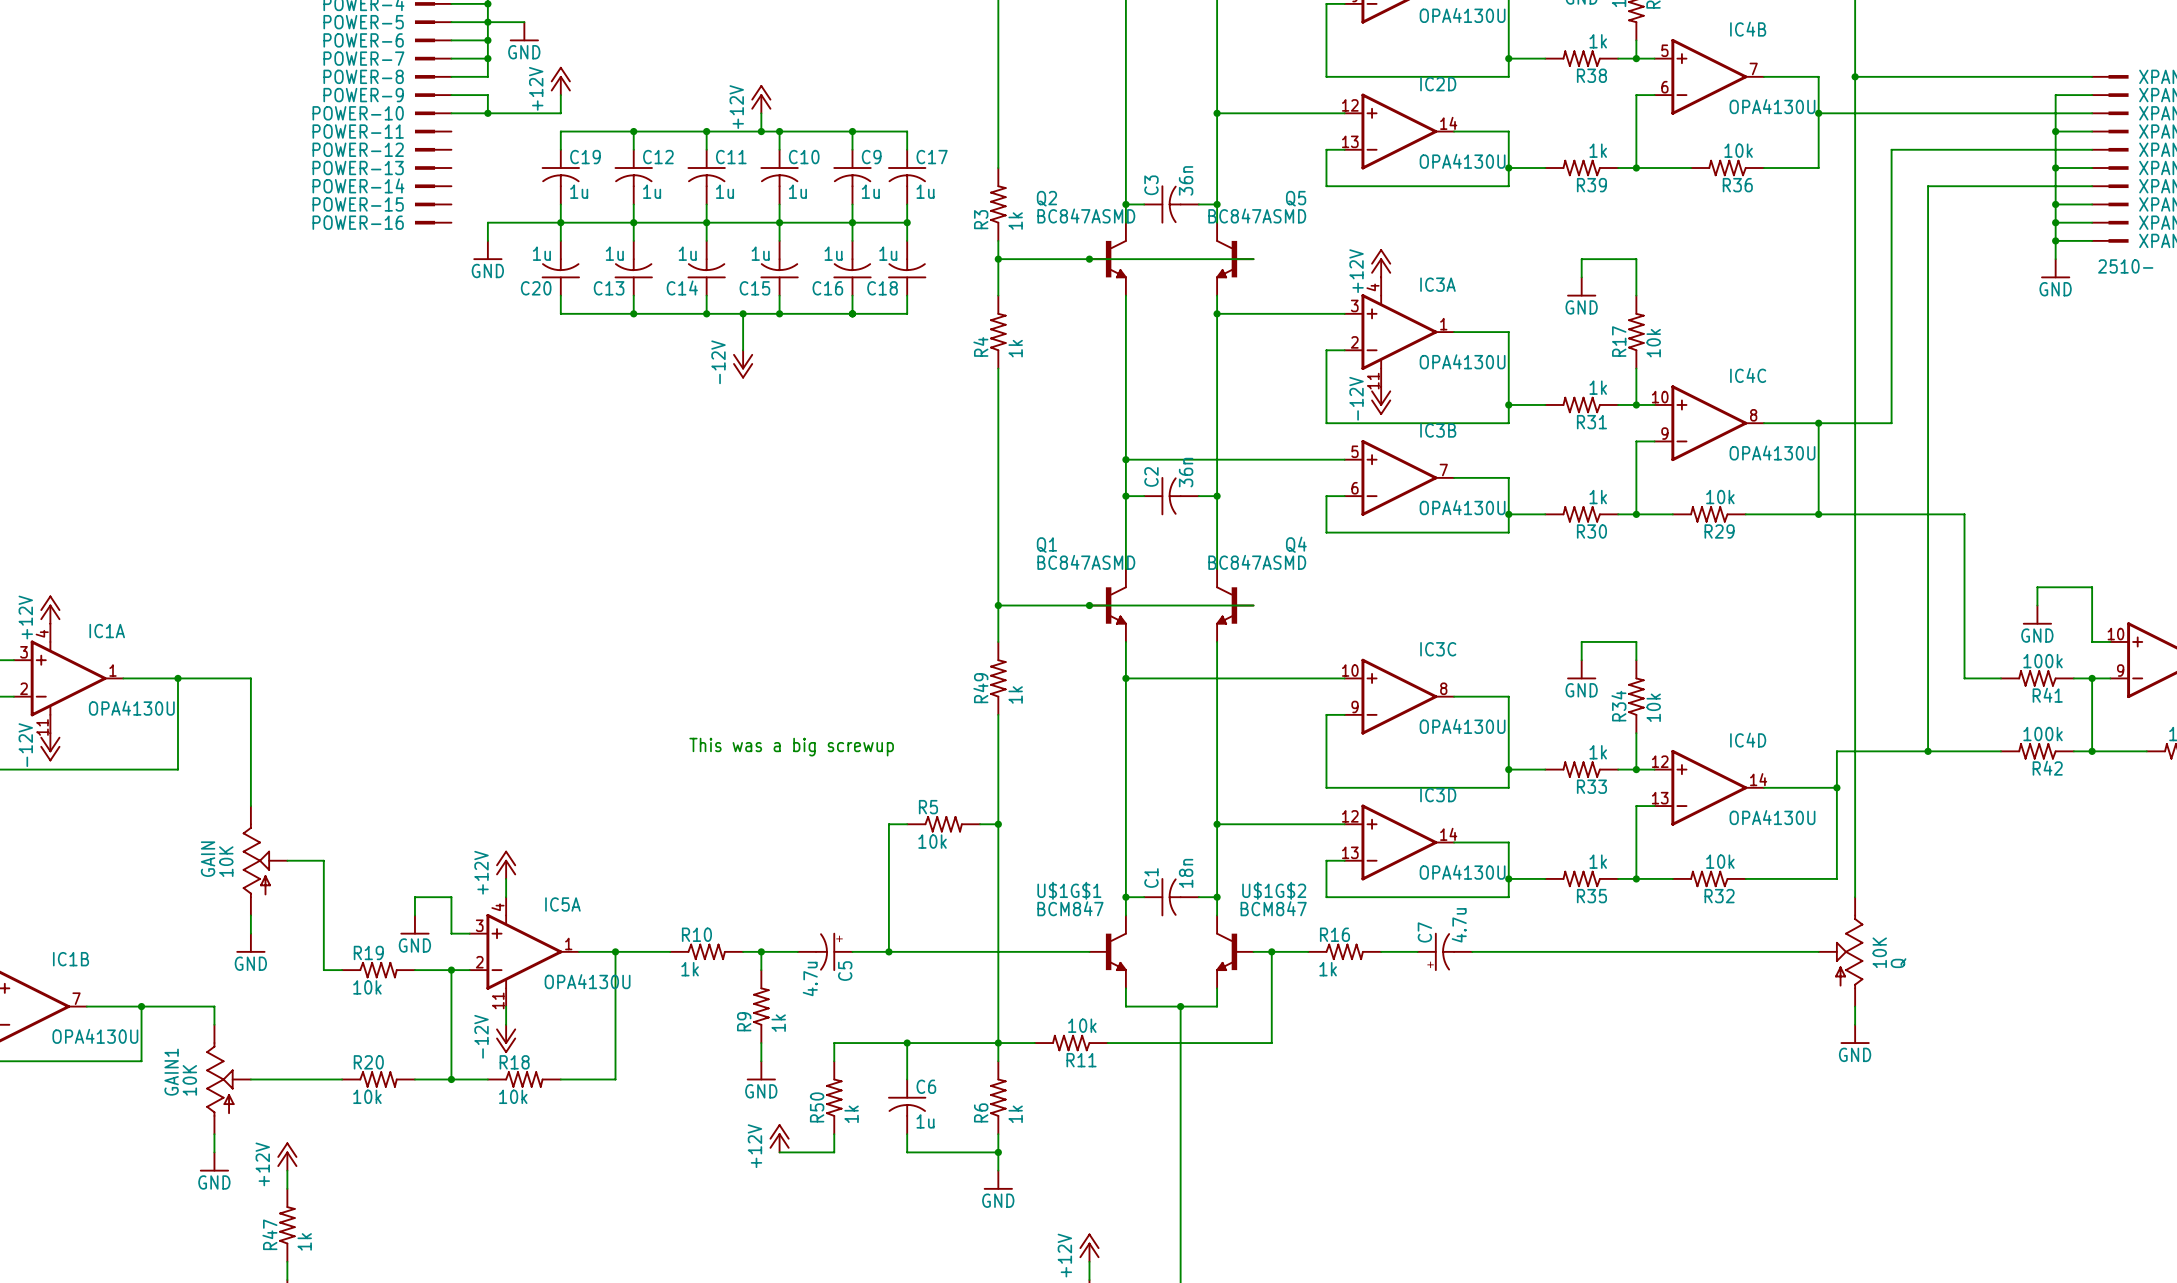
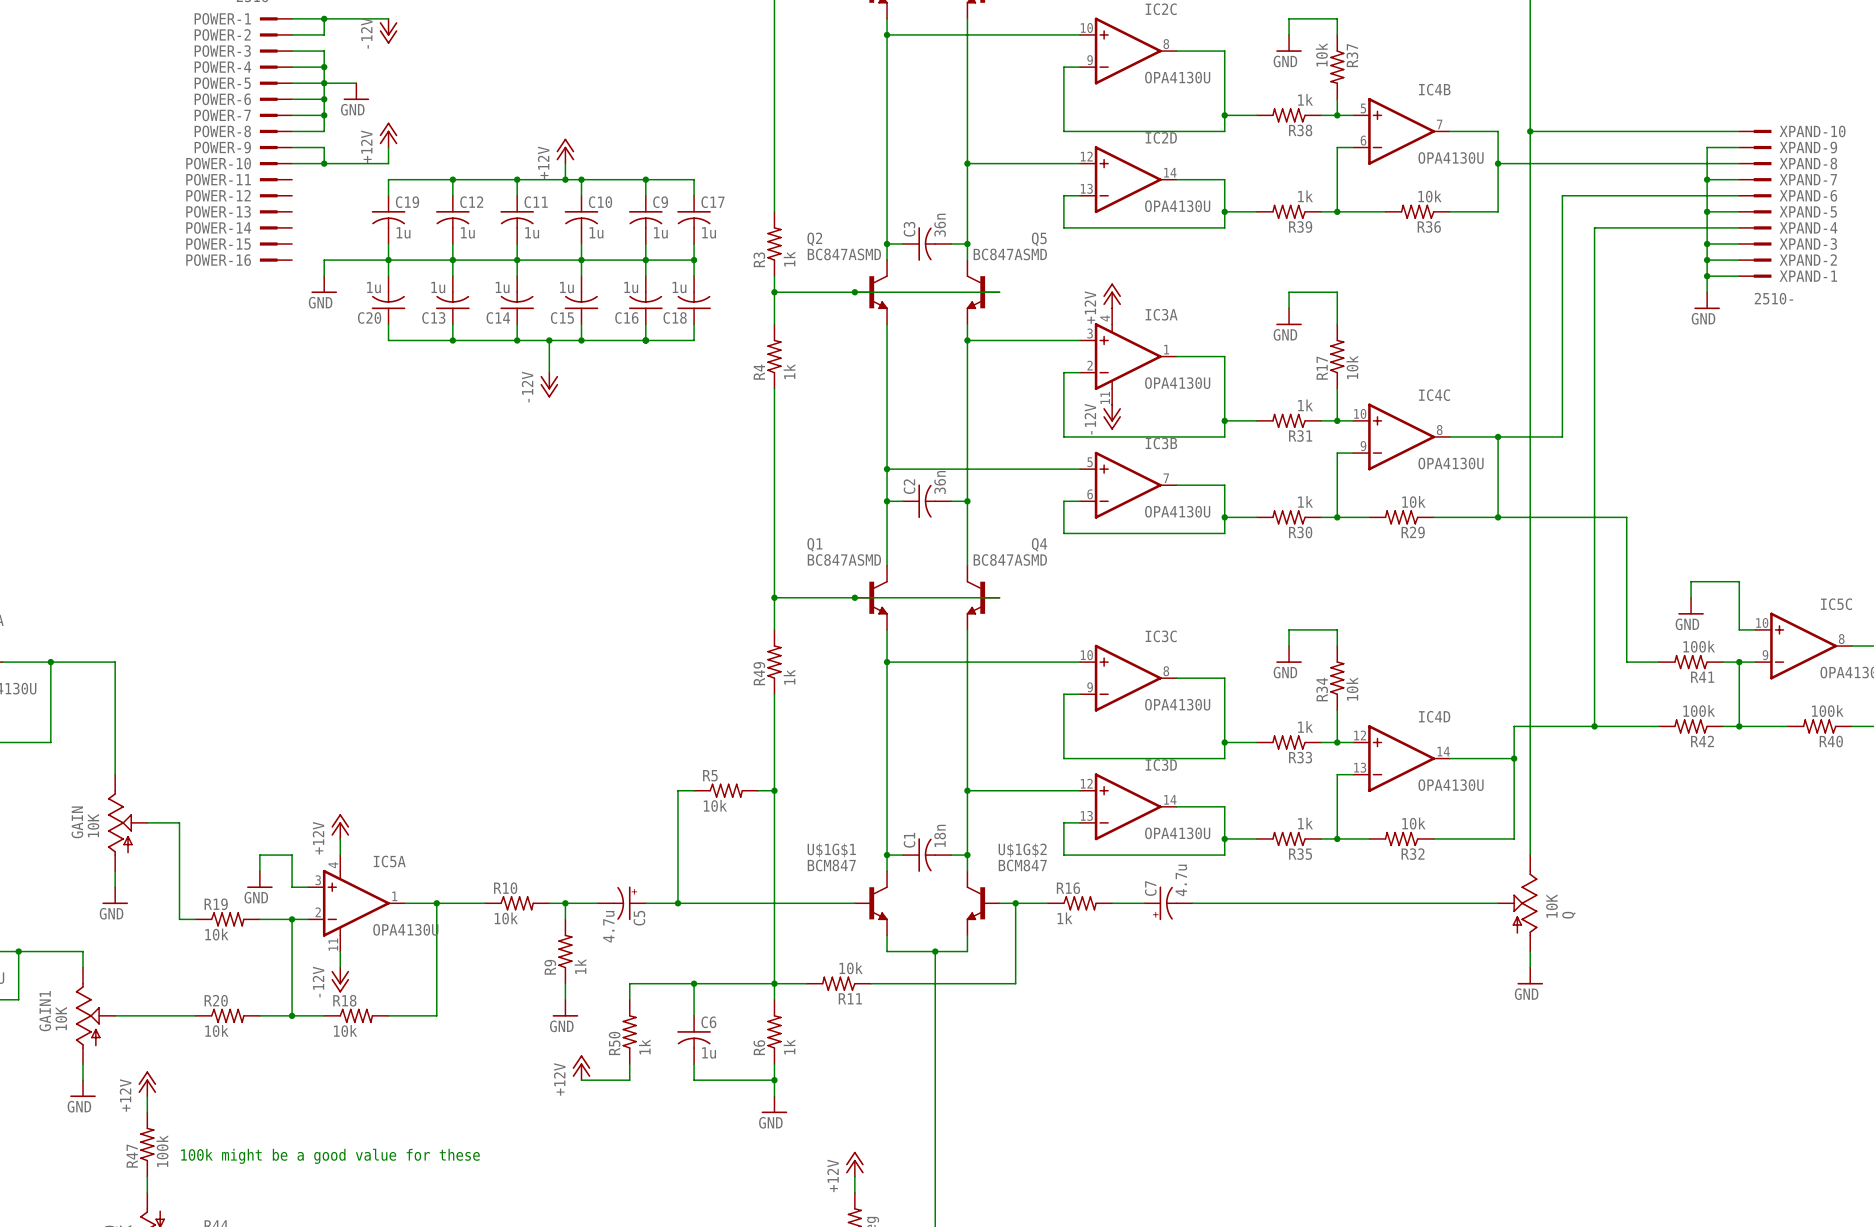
text: This was a big screwup (791, 747) -> none
R10 value: 1k (690, 969) -> 10k (506, 918)
text: none -> 100k might be a good value for these (330, 1156)
R47 value: 1k (304, 1241) -> 100k (162, 1151)

